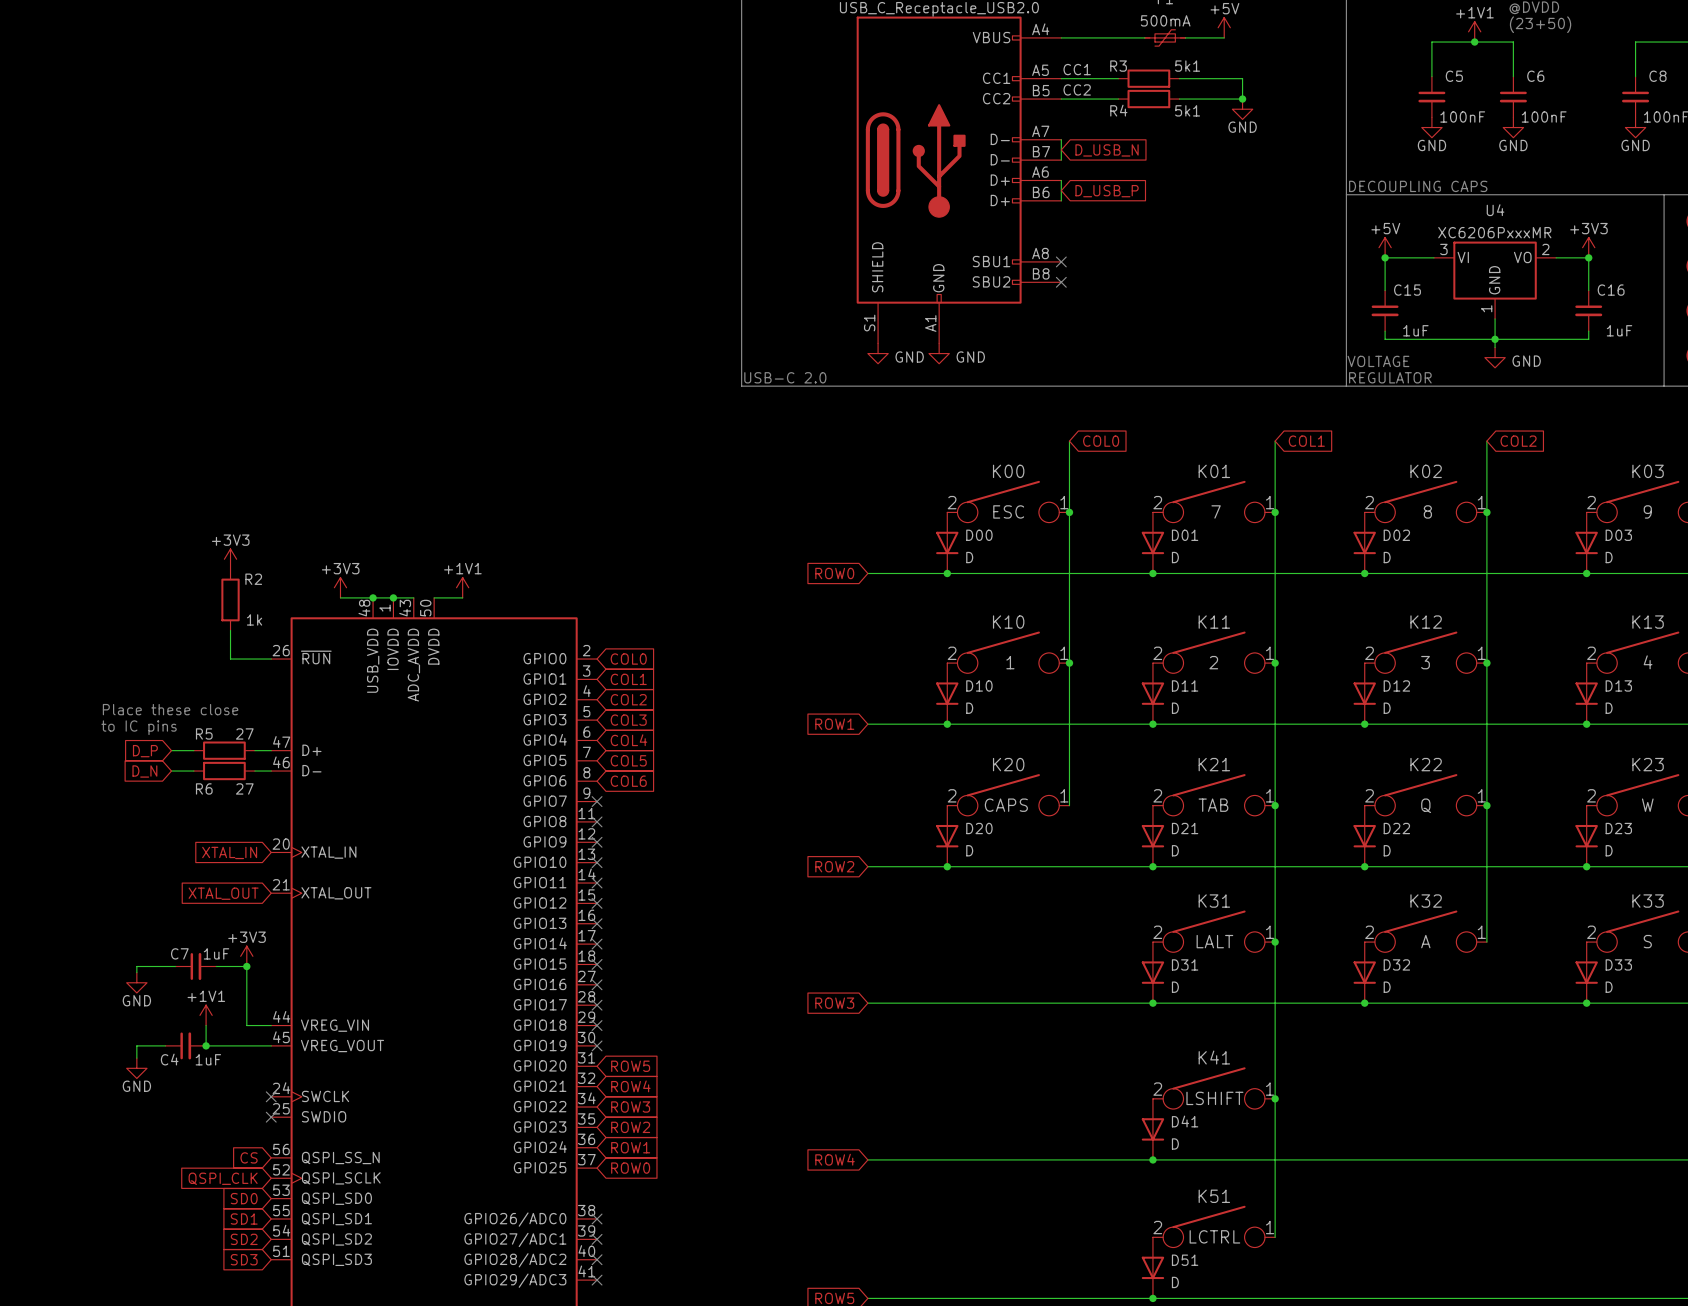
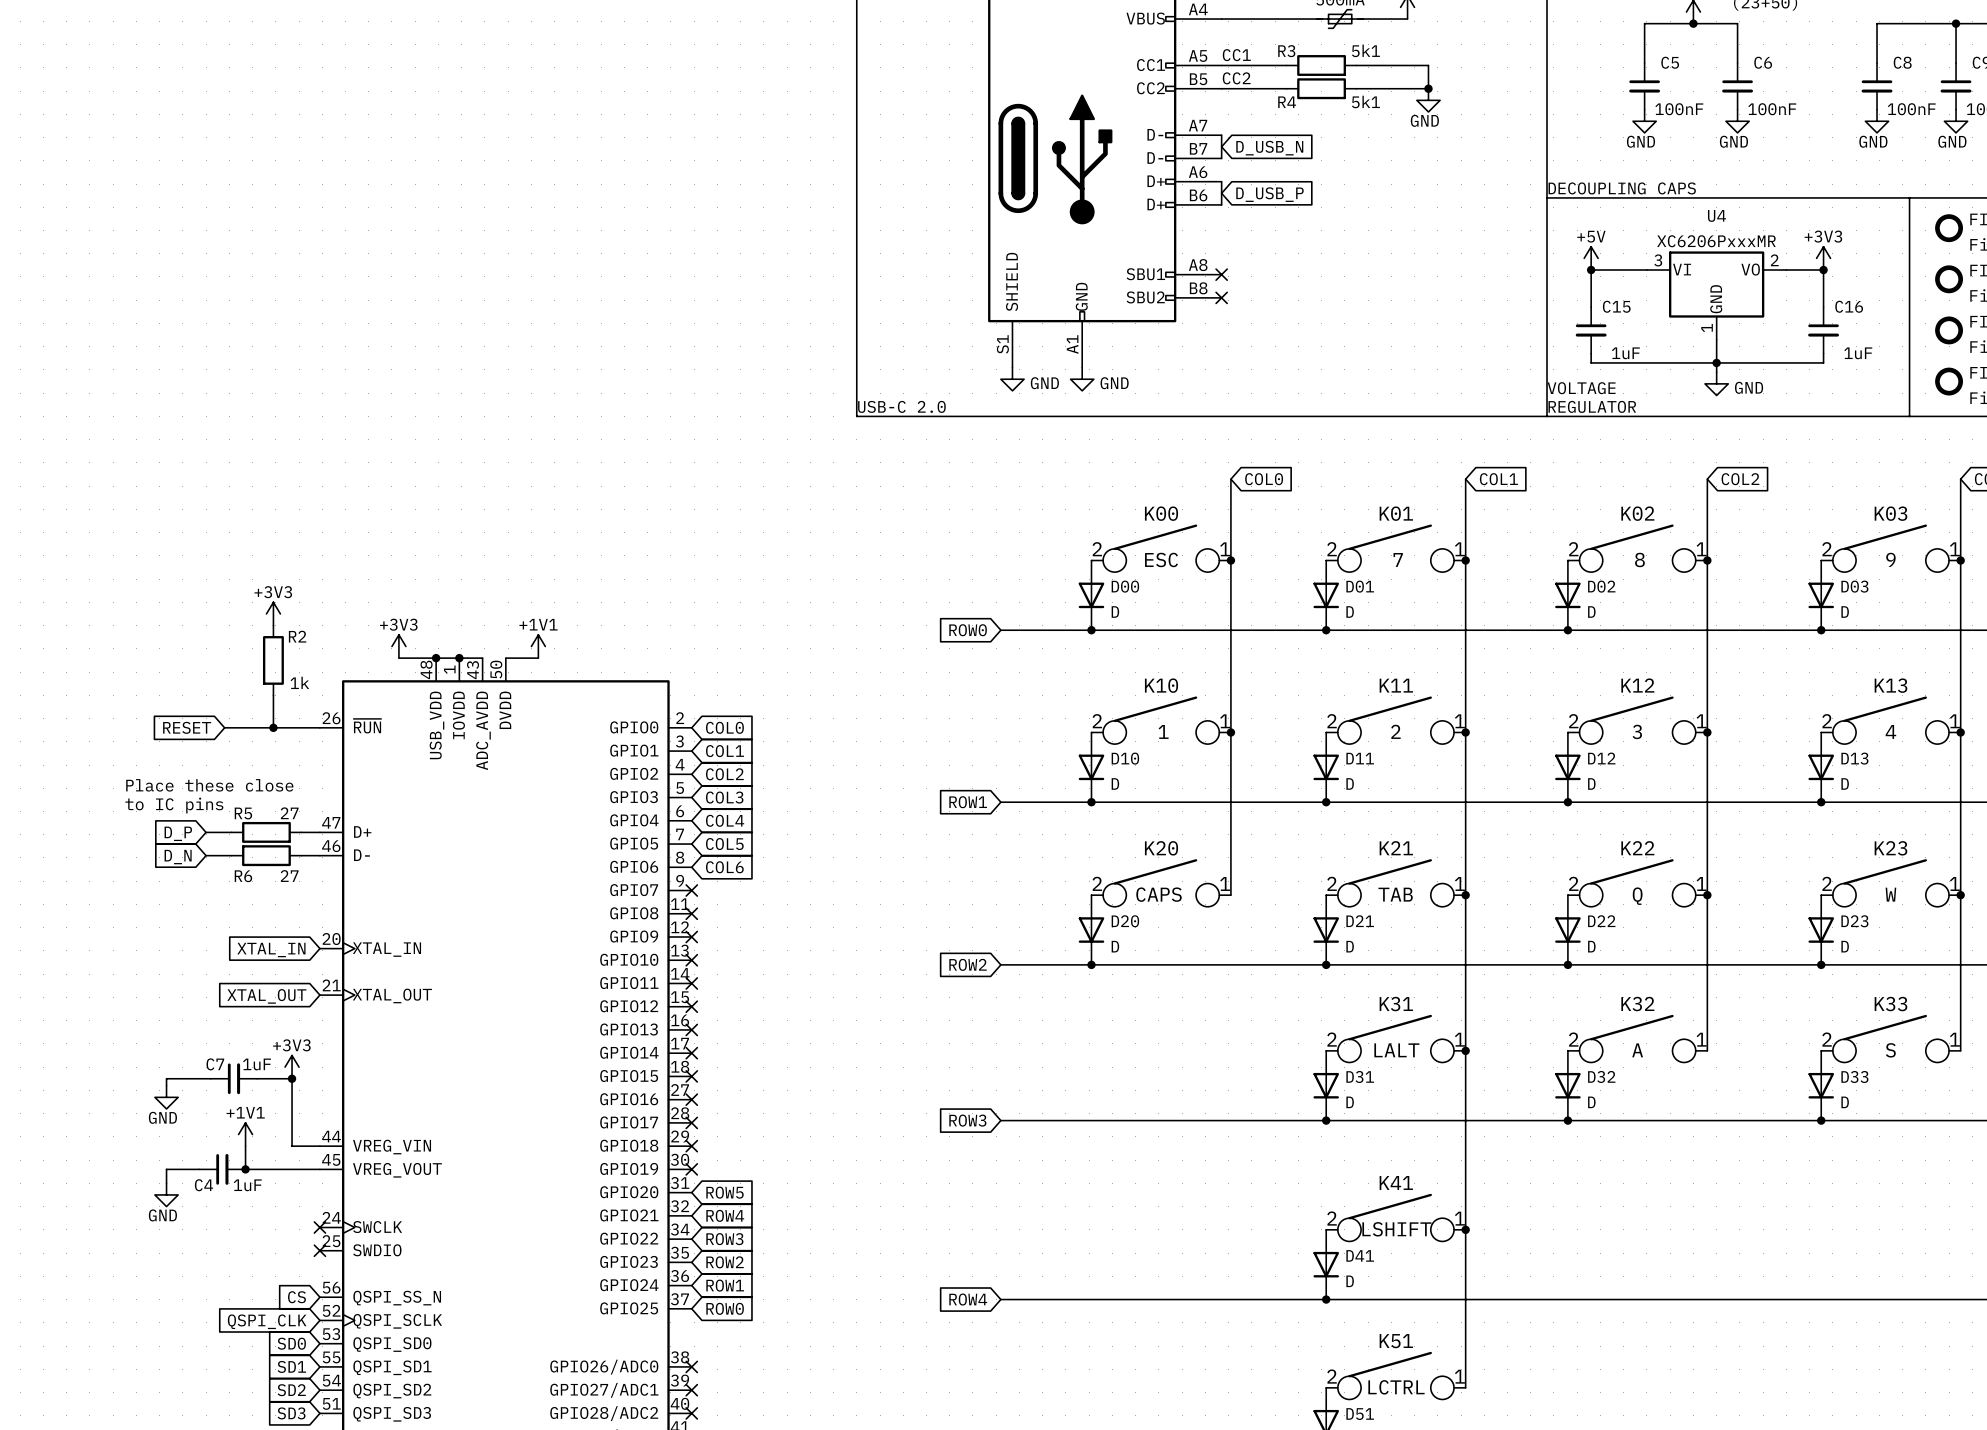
global label: none -> RESET (187, 727)
wire: none -> (224, 727) (273, 727)
junction: none -> (273, 727)

